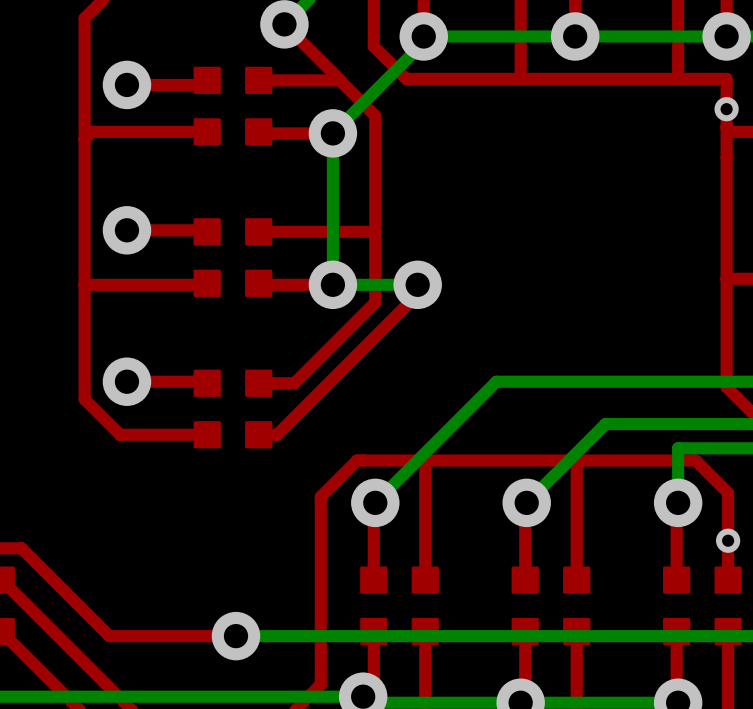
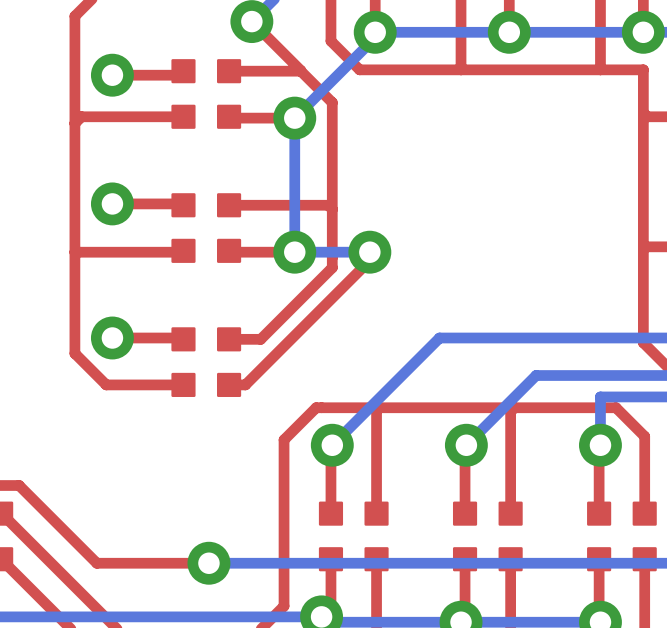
via: (726, 109) -> none
via: (728, 540) -> none

